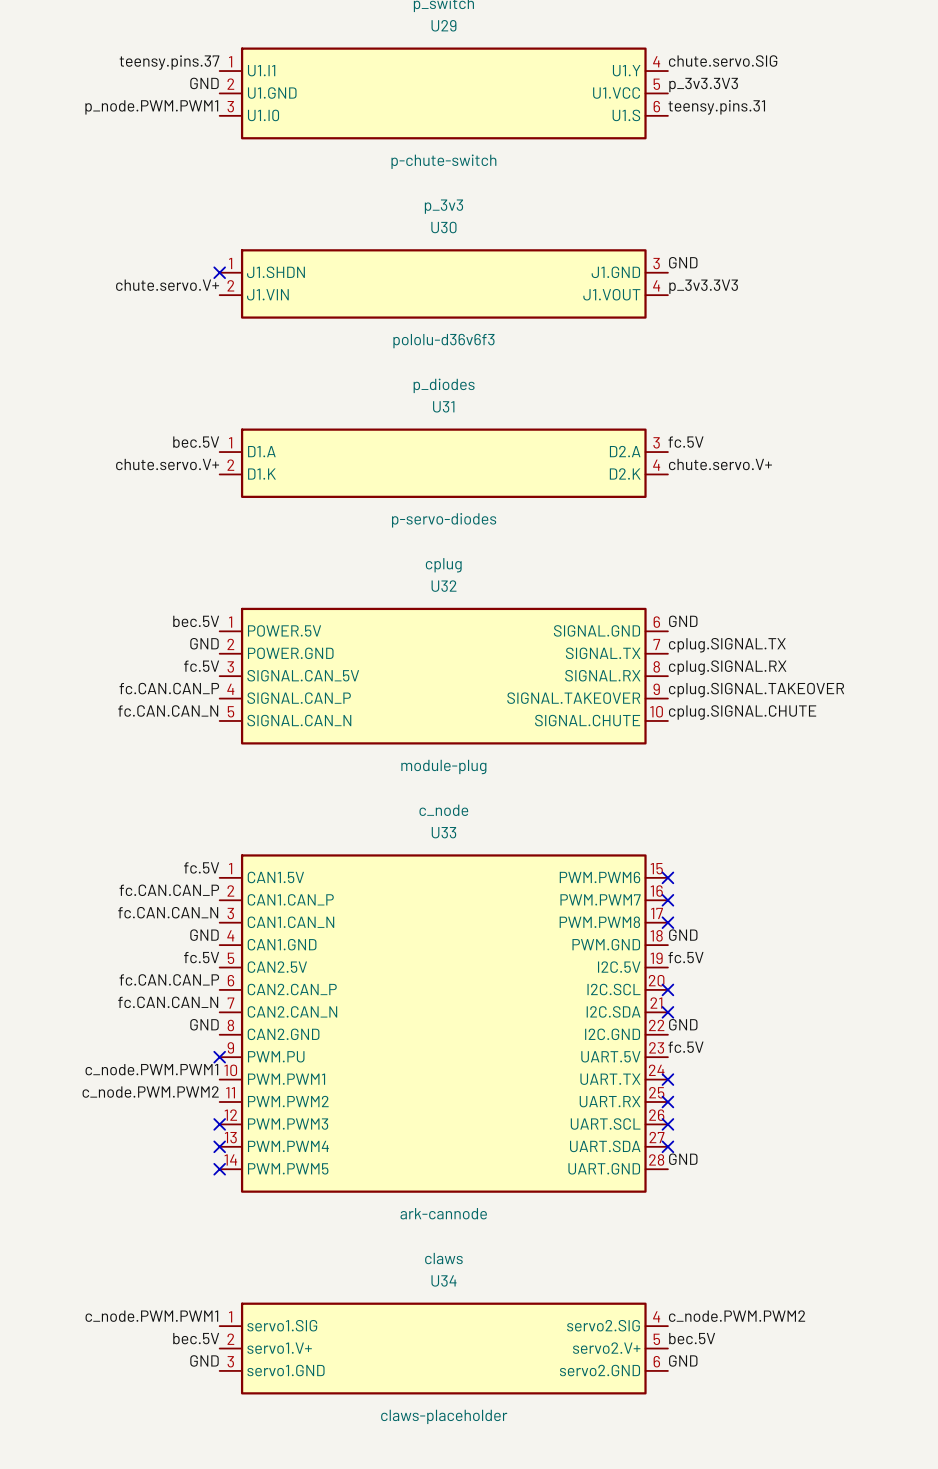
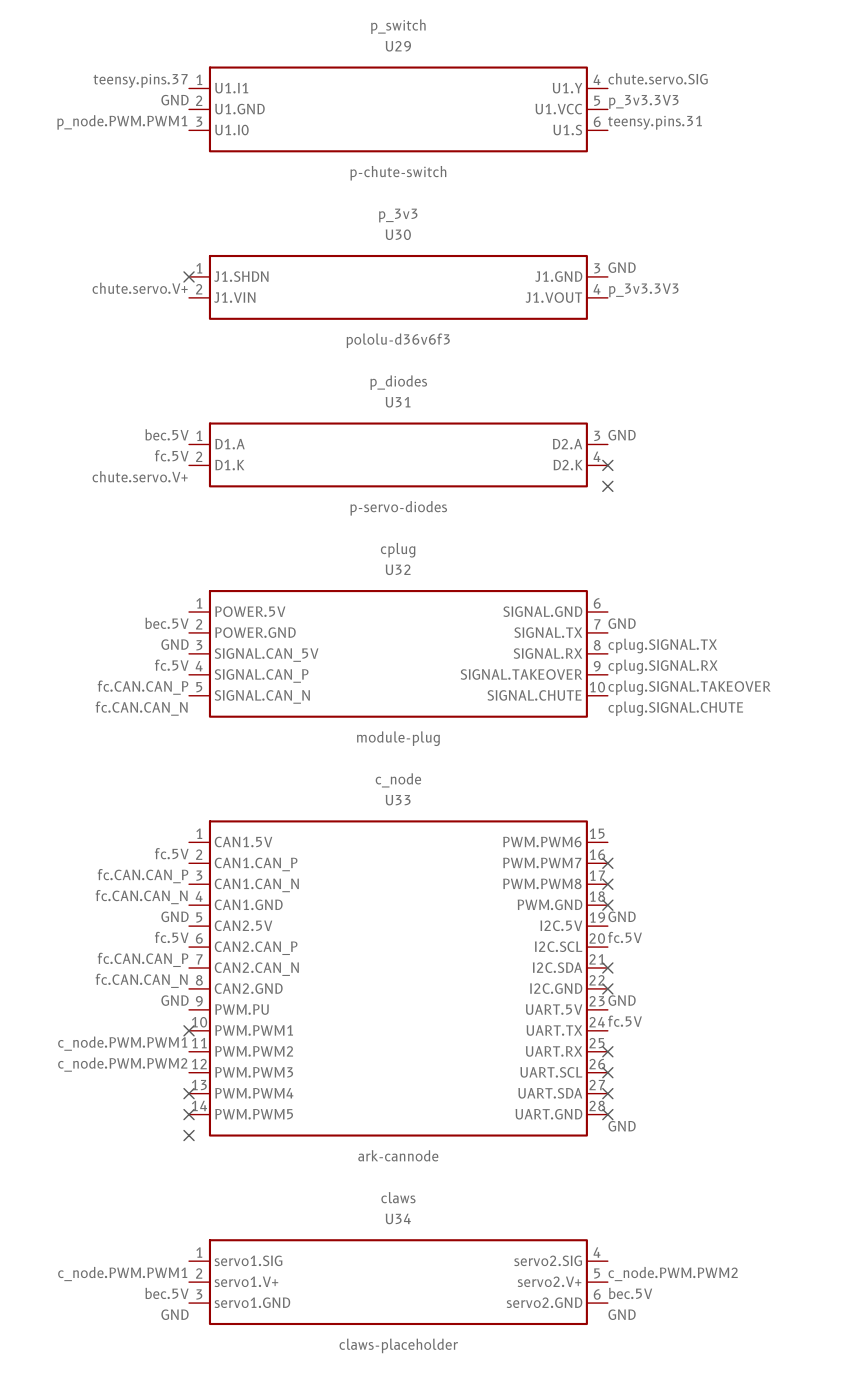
label: fc.5V (686, 442) -> GND (622, 435)
label: chute.servo.V+ (167, 464) -> fc.5V (171, 455)
label: chute.servo.V+ (720, 464) -> none
no-connect mark: none -> (607, 465)
label: none -> chute.servo.V+ (140, 476)
no-connect mark: none -> (607, 486)
label: bec.5V (196, 621) -> none
label: GND (683, 621) -> none
label: GND (204, 643) -> bec.5V (167, 623)
label: cplug.SIGNAL.TX (727, 645) -> GND (622, 623)
label: fc.5V (201, 666) -> GND (175, 644)
label: cplug.SIGNAL.RX (727, 667) -> cplug.SIGNAL.TX (662, 645)
label: fc.CAN.CAN_P (169, 688) -> fc.5V (171, 665)
label: cplug.SIGNAL.TAKEOVER (756, 690) -> cplug.SIGNAL.RX (663, 666)
label: fc.CAN.CAN_N (168, 710) -> fc.CAN.CAN_P (143, 687)
label: cplug.SIGNAL.CHUTE (742, 712) -> cplug.SIGNAL.TAKEOVER (689, 687)
label: none -> fc.CAN.CAN_N (141, 708)
label: none -> cplug.SIGNAL.CHUTE (675, 708)
label: fc.5V (201, 867) -> none
no-connect mark: (667, 877) -> none
label: fc.CAN.CAN_P (169, 890) -> fc.5V (171, 853)
label: fc.CAN.CAN_N (168, 912) -> fc.CAN.CAN_P (143, 876)
label: GND (204, 935) -> fc.CAN.CAN_N (141, 897)
label: GND (683, 935) -> none
no-connect mark: none -> (607, 905)
label: fc.5V (201, 957) -> GND (175, 916)
label: fc.5V (686, 957) -> GND (622, 916)
label: fc.CAN.CAN_P (169, 979) -> fc.5V (171, 937)
label: none -> fc.5V (625, 937)
no-connect mark: (667, 989) -> none
label: fc.CAN.CAN_N (168, 1002) -> fc.CAN.CAN_P (143, 959)
label: GND (204, 1024) -> fc.CAN.CAN_N (141, 980)
label: GND (683, 1024) -> none
no-connect mark: none -> (607, 988)
label: none -> GND (175, 1000)
label: fc.5V (686, 1047) -> GND (622, 1000)
no-connect mark: (219, 1057) -> none
label: c_node.PWM.PWM1 (151, 1069) -> none
label: none -> fc.5V (625, 1021)
no-connect mark: none -> (189, 1030)
no-connect mark: (667, 1079) -> none
label: c_node.PWM.PWM2 (150, 1092) -> c_node.PWM.PWM1 (122, 1043)
label: none -> c_node.PWM.PWM2 (122, 1064)
no-connect mark: (219, 1124) -> none
label position: GND (683, 1159) -> GND (622, 1126)
no-connect mark: none -> (607, 1114)
no-connect mark: none -> (189, 1135)
label: c_node.PWM.PWM1 (151, 1316) -> none
label: c_node.PWM.PWM2 (737, 1316) -> none
label: bec.5V (196, 1338) -> c_node.PWM.PWM1 (122, 1273)
label: bec.5V (692, 1338) -> c_node.PWM.PWM2 (673, 1273)
label: GND (204, 1360) -> bec.5V (167, 1293)
label: GND (683, 1360) -> bec.5V (630, 1293)
label: none -> GND (175, 1314)
label: none -> GND (622, 1314)

